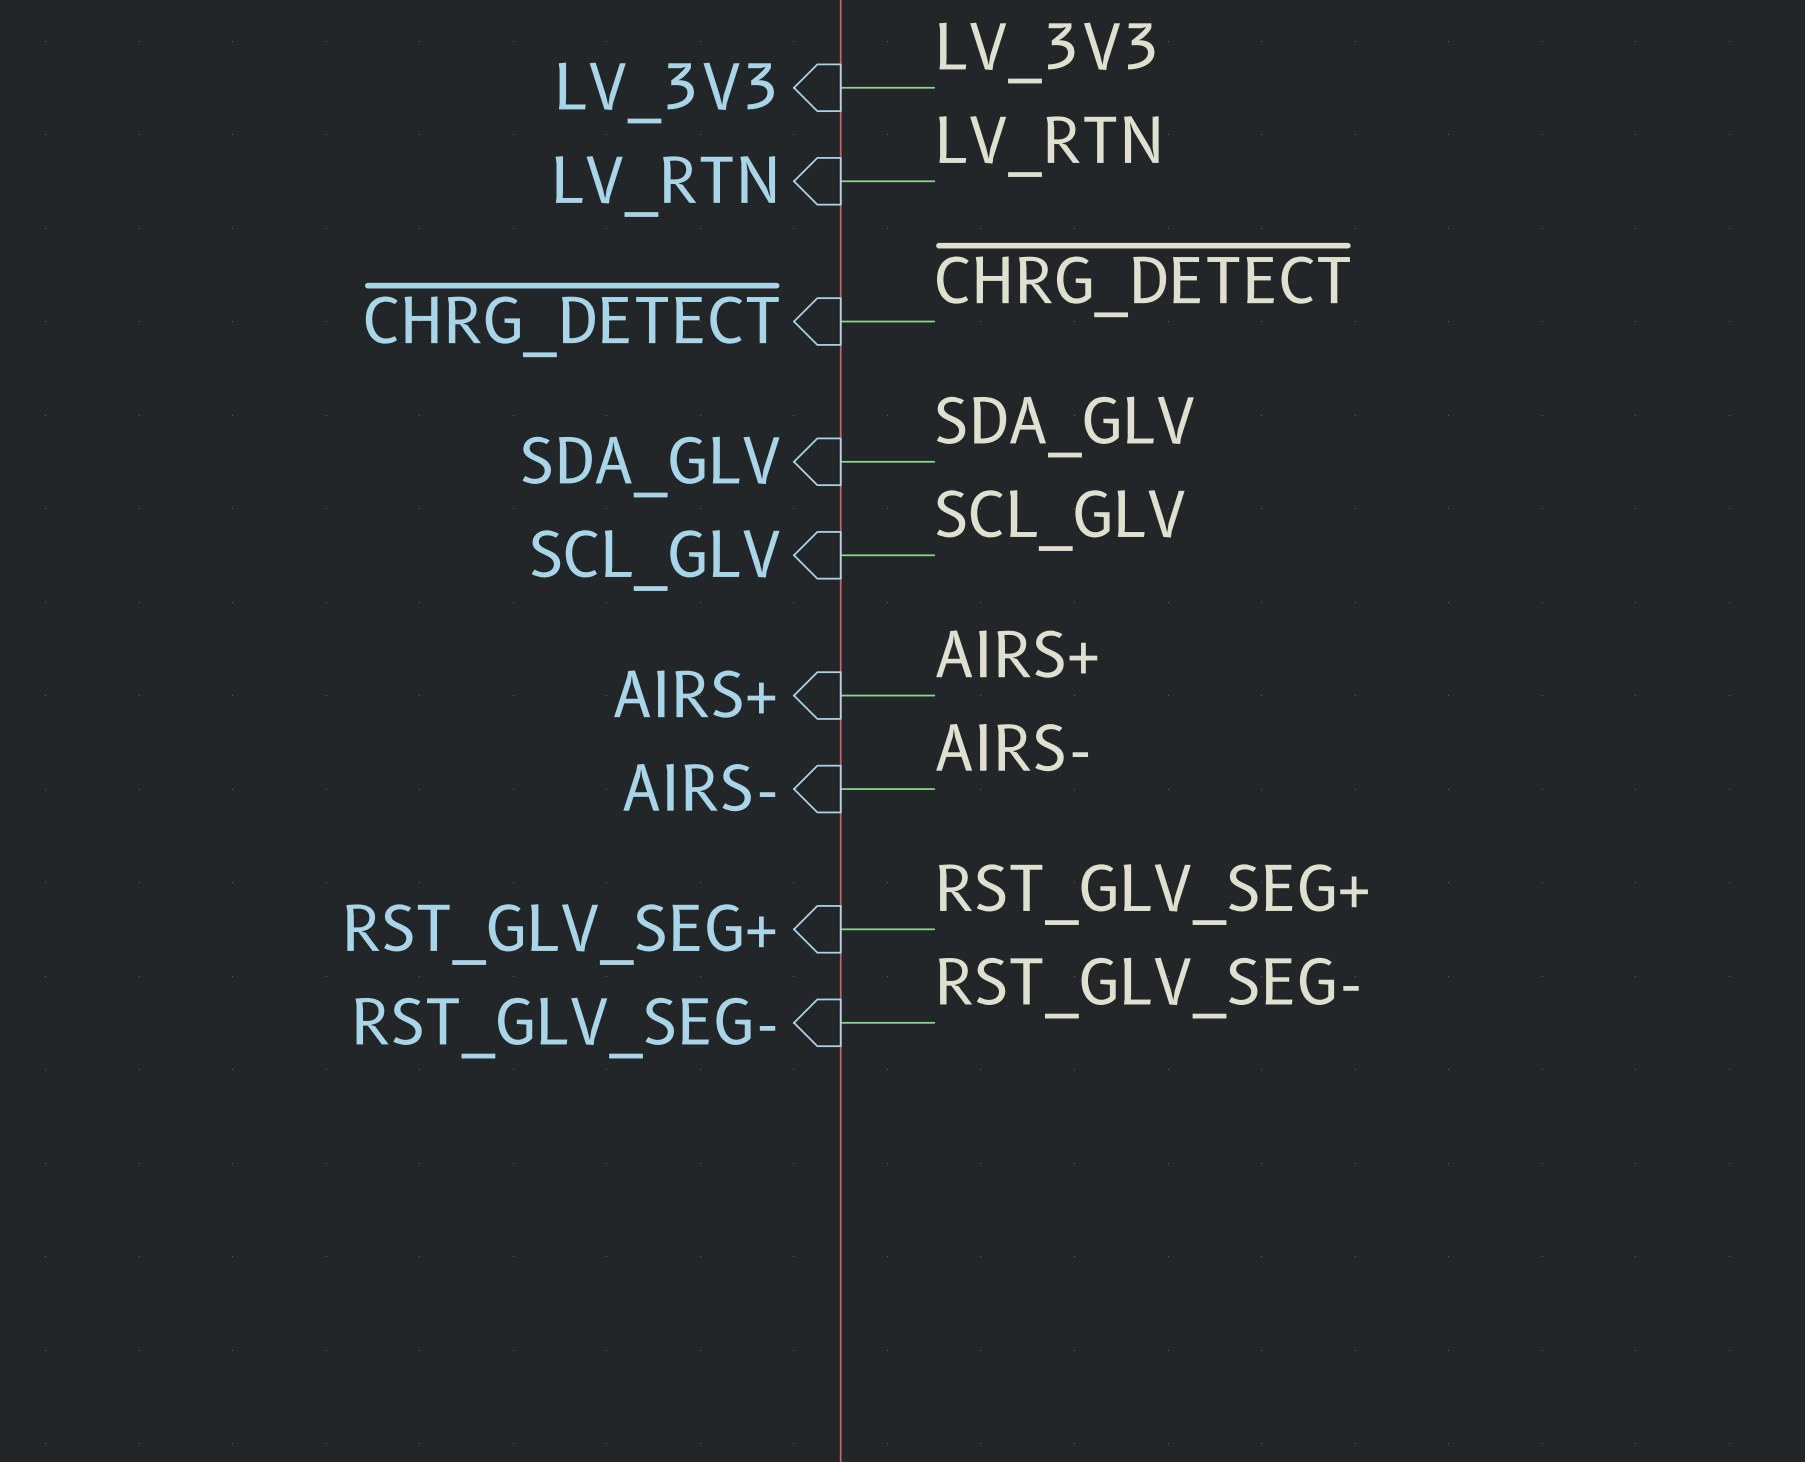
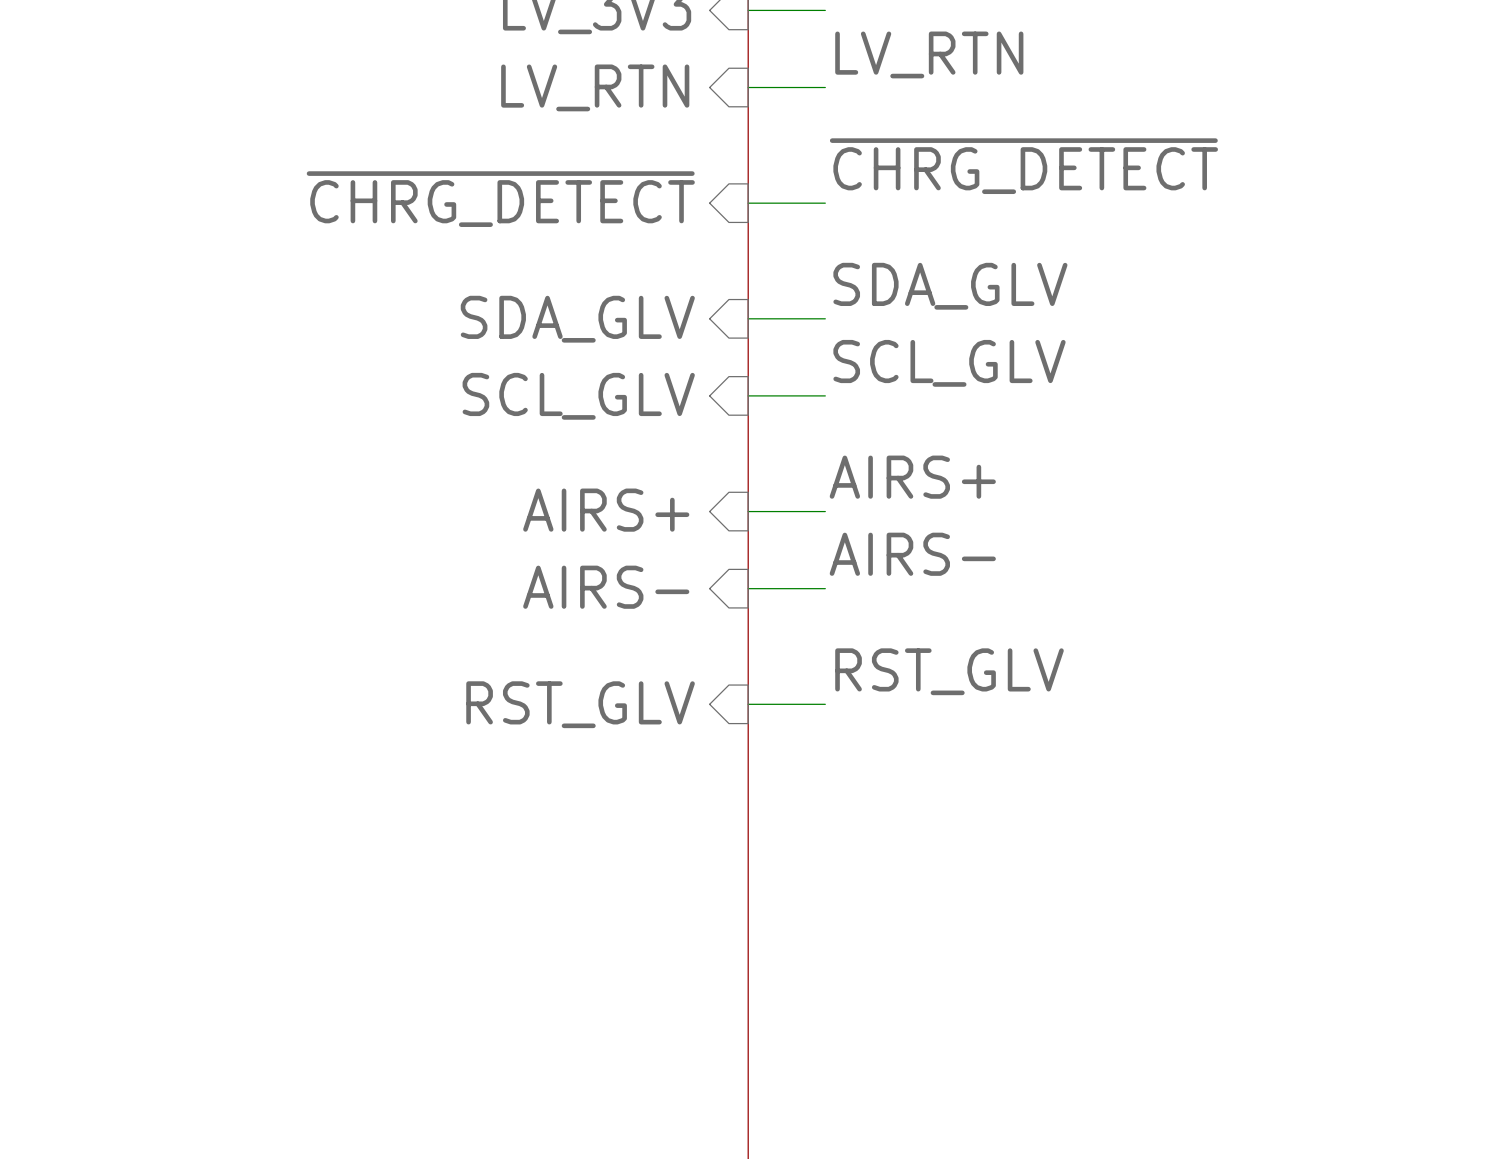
label: RST_GLV_SEG+ (1153, 894) -> RST_GLV (949, 671)
sheet pin: RST_GLV_SEG+ (560, 934) -> RST_GLV (580, 704)
label: RST_GLV_SEG- (1148, 988) -> none
wire: (840, 1022) (934, 1022) -> none
sheet pin: RST_GLV_SEG- (565, 1028) -> none

